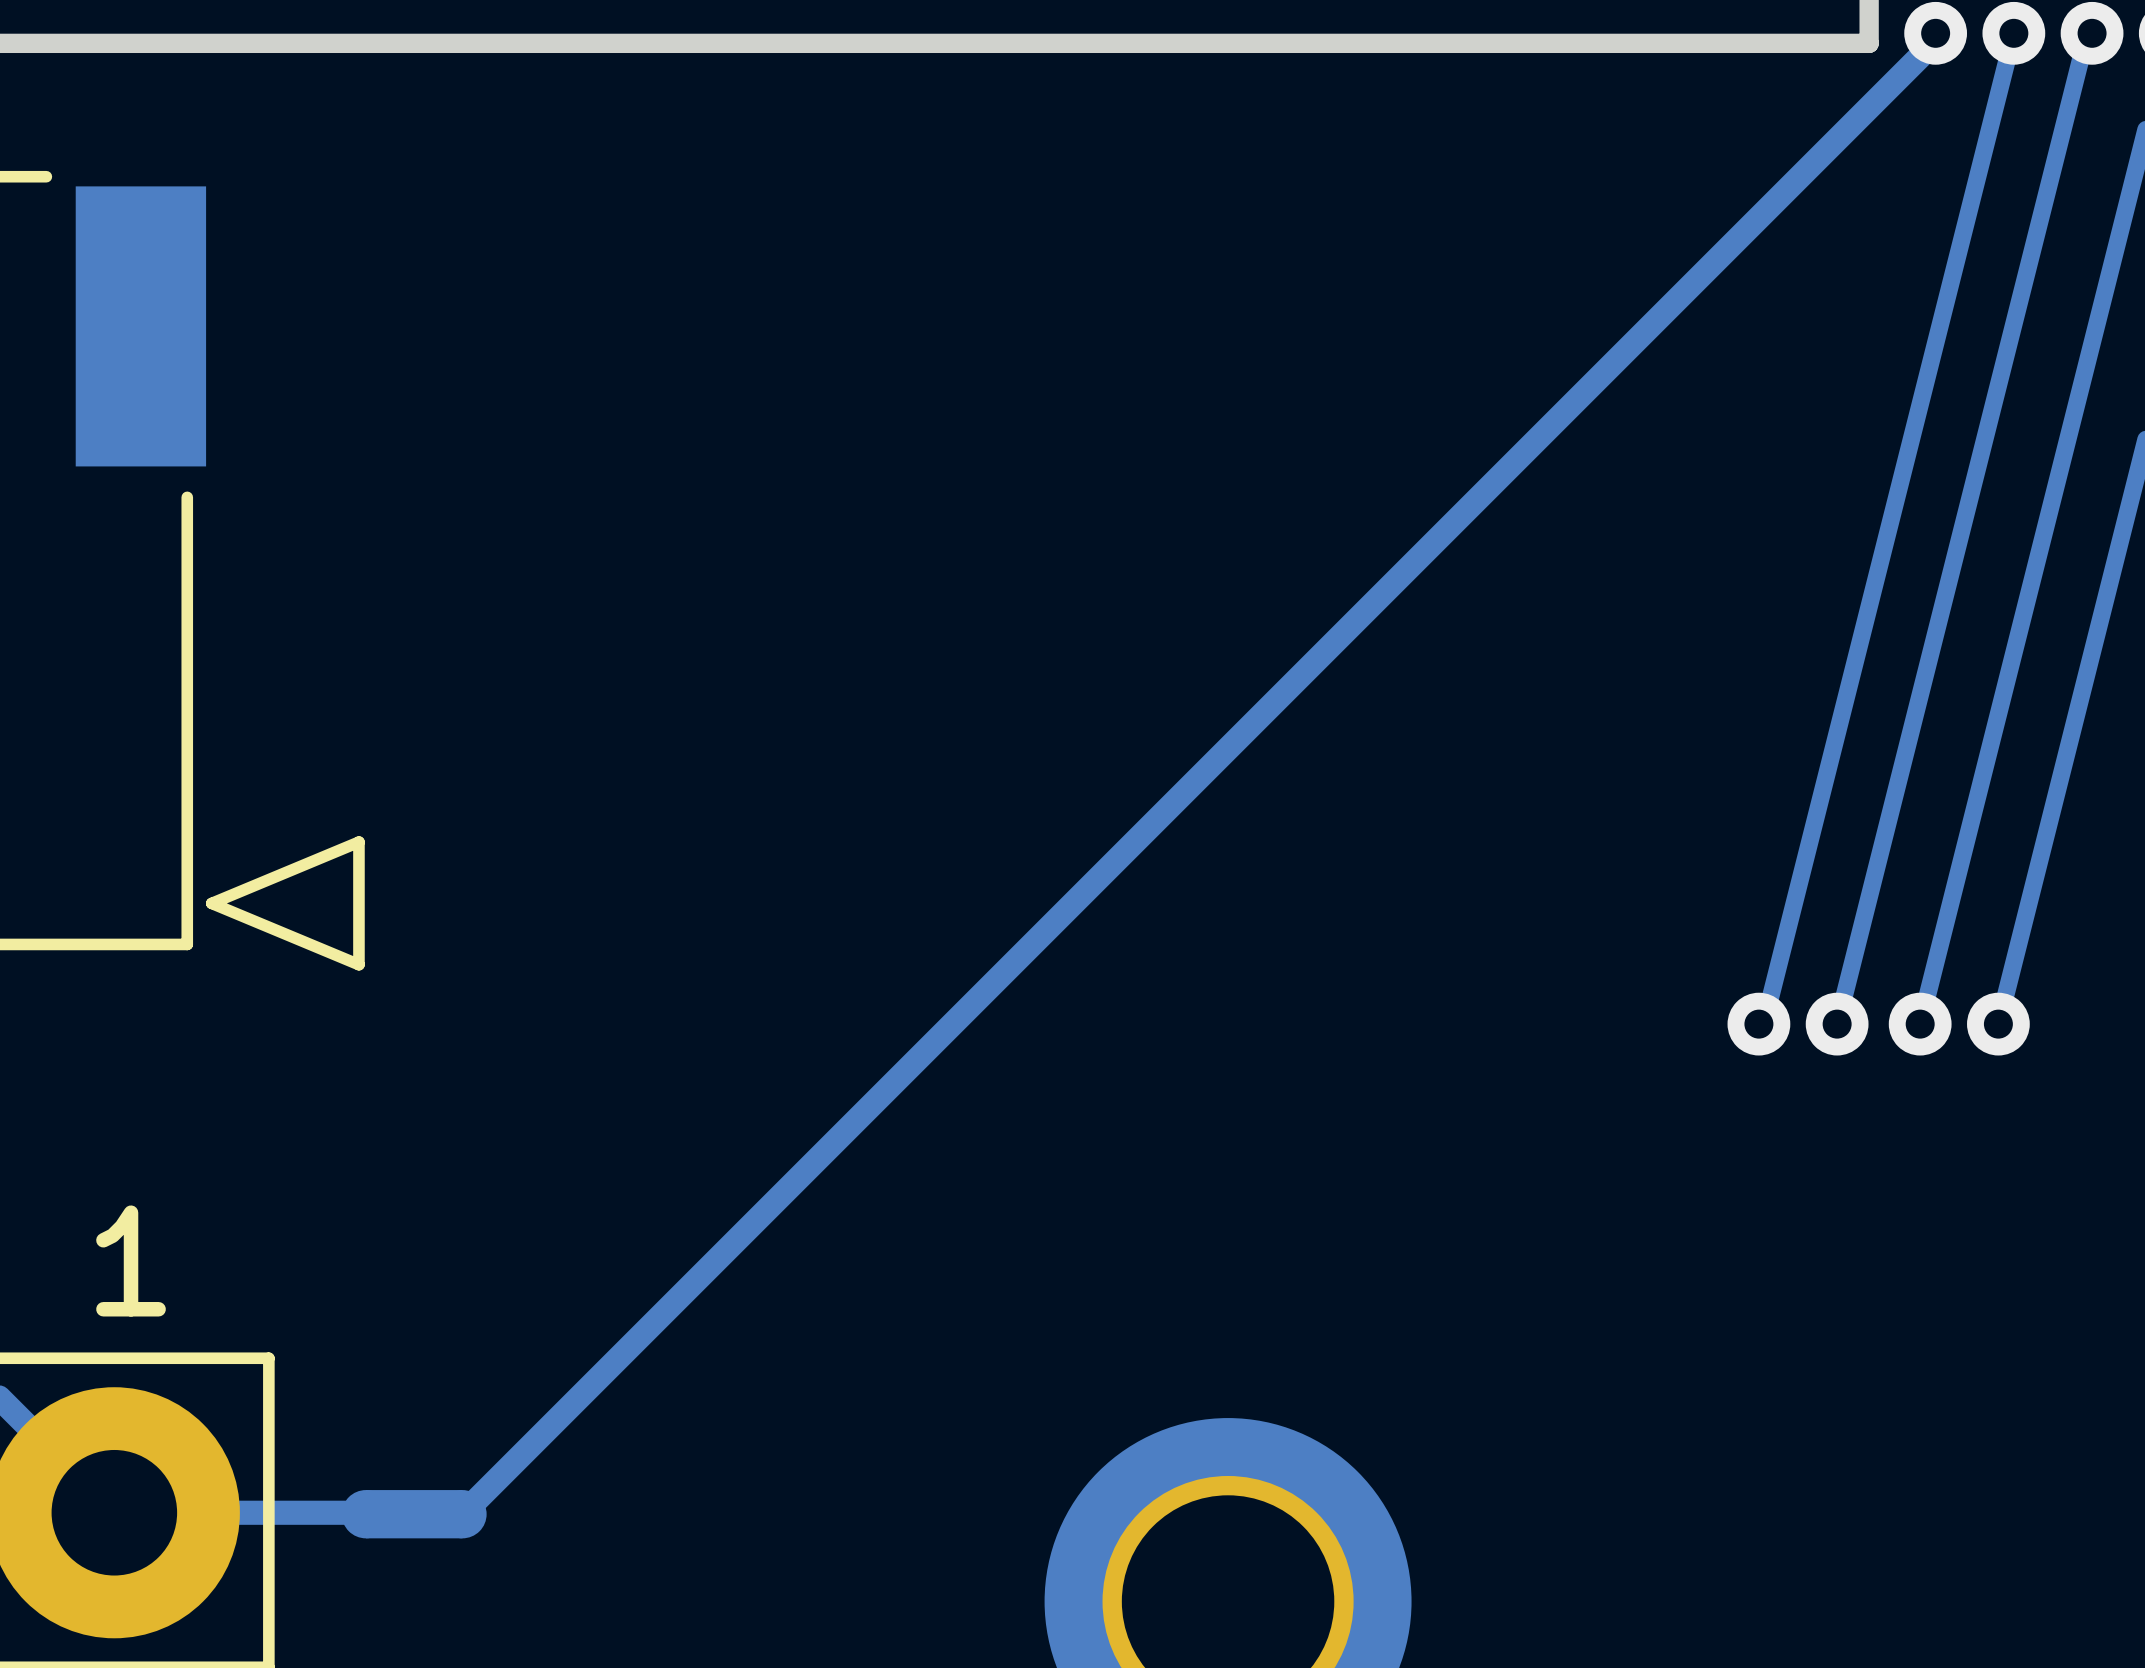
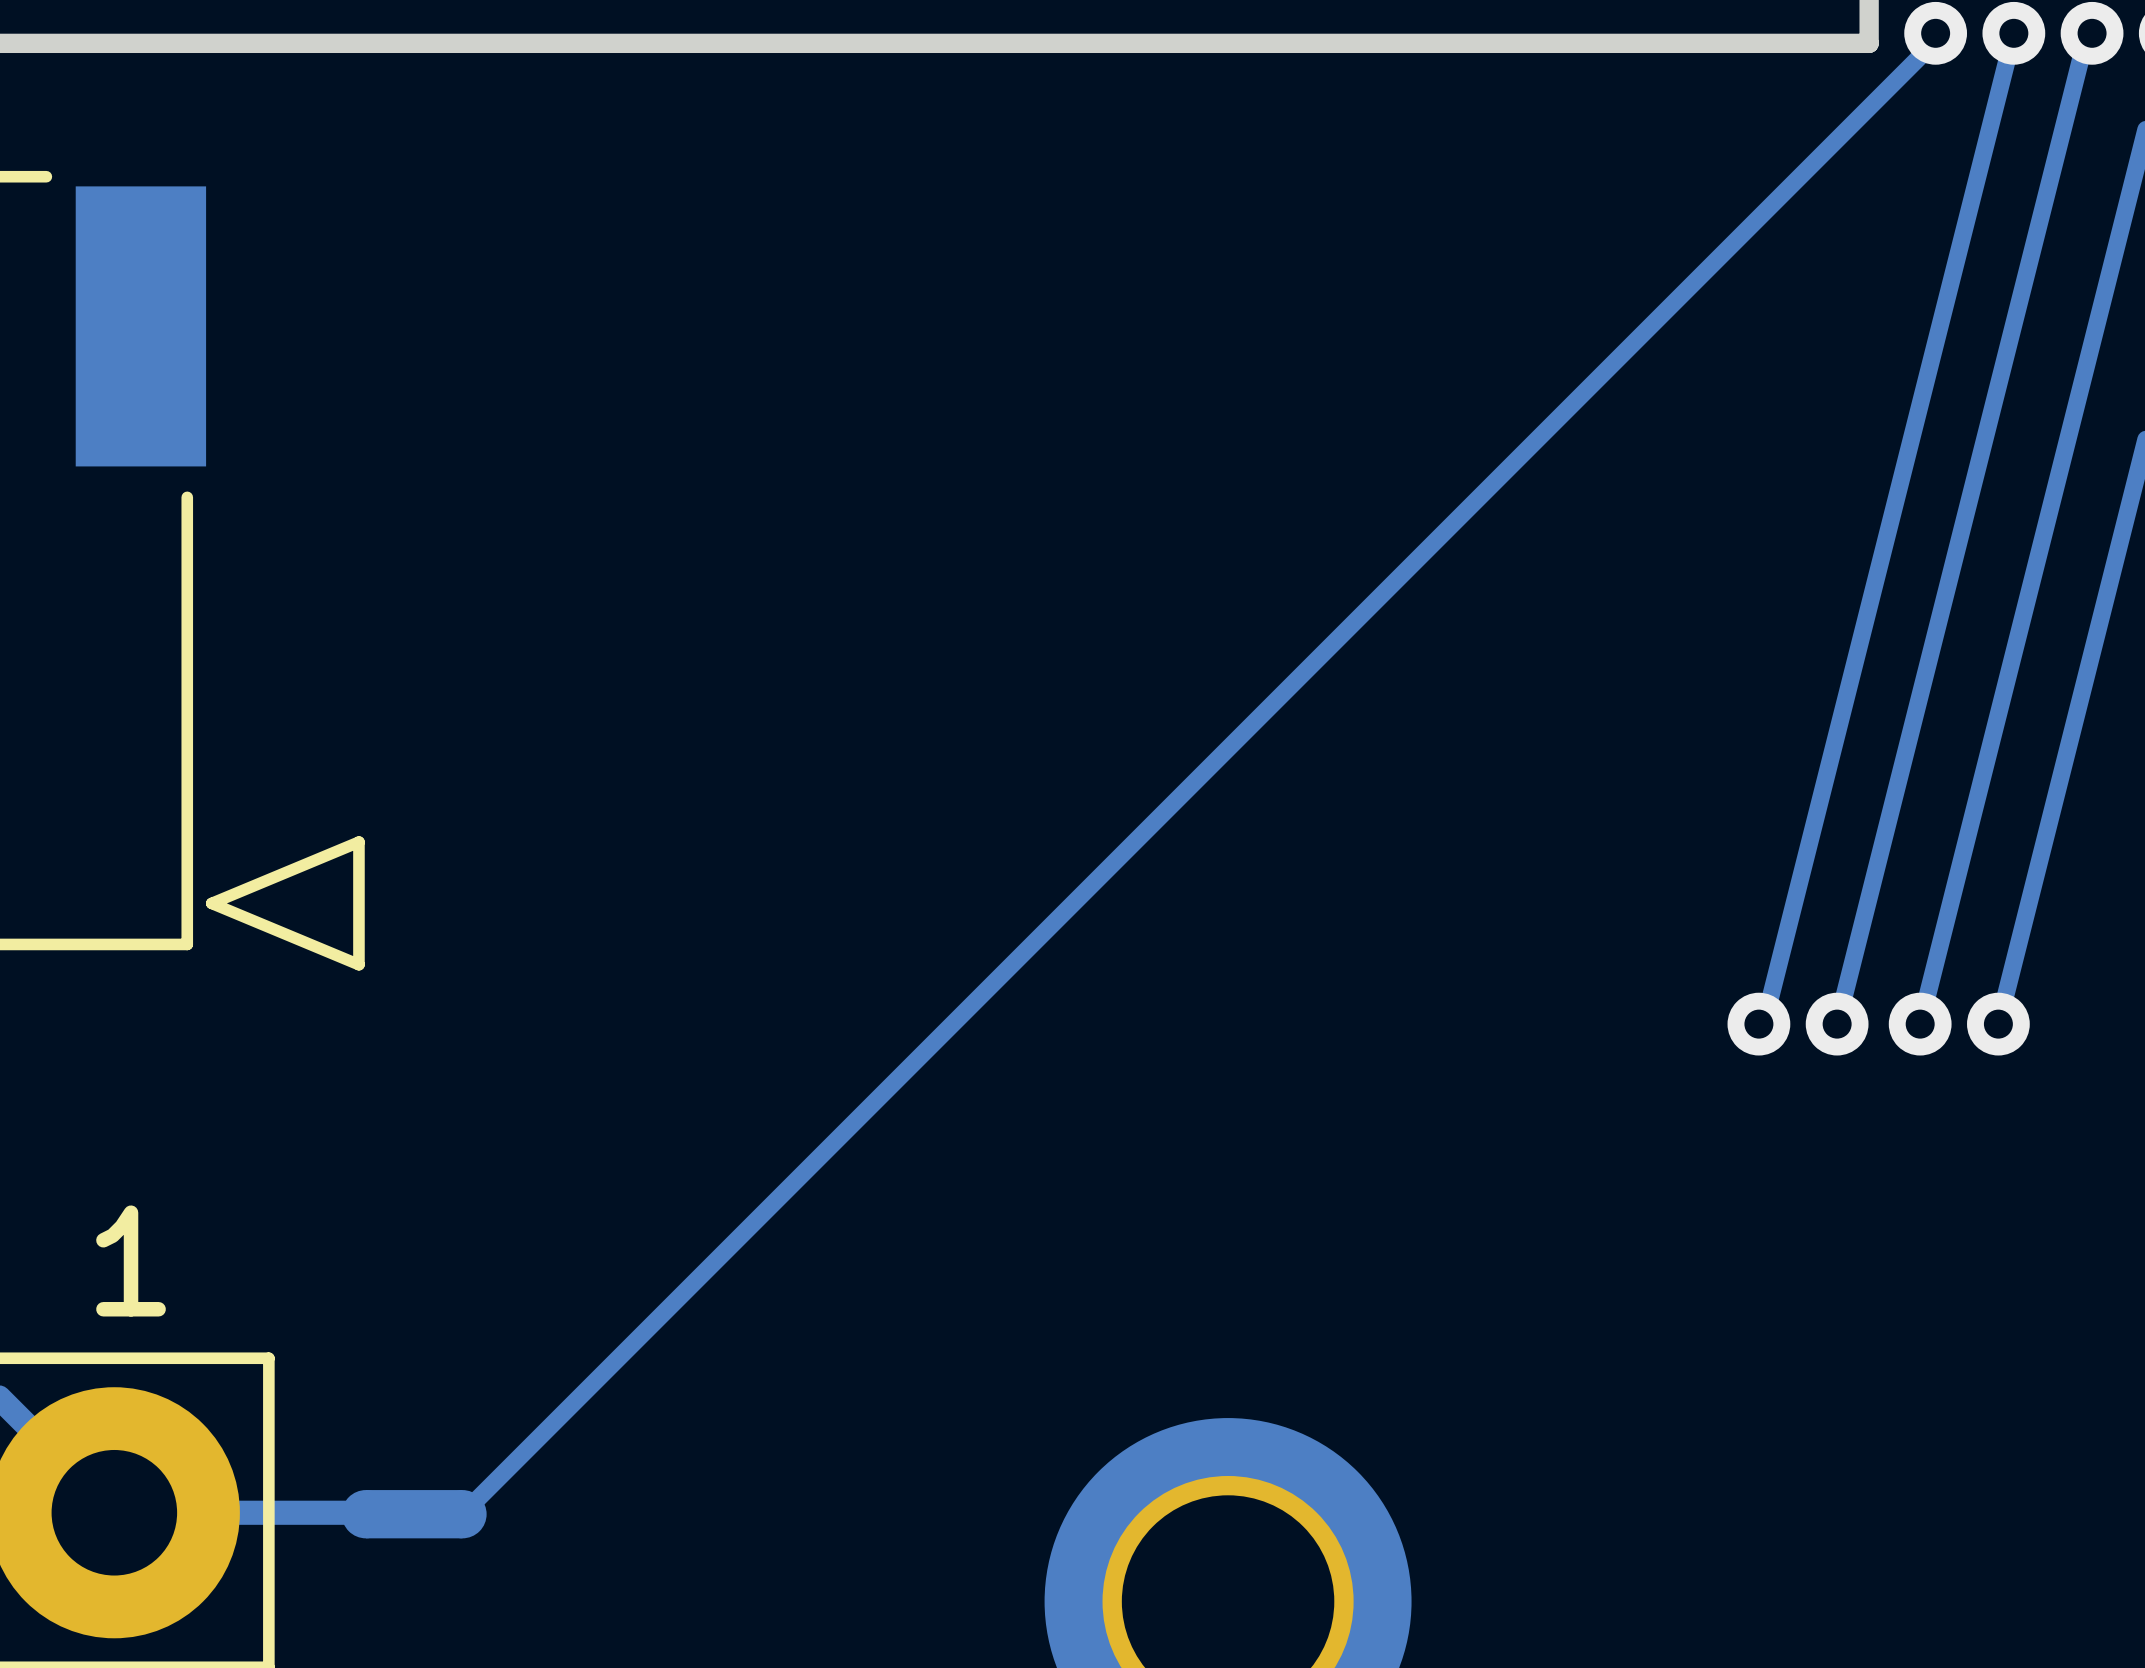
track width: thick (1935, 41) (462, 1514) -> thin (1935, 41) (462, 1514)

